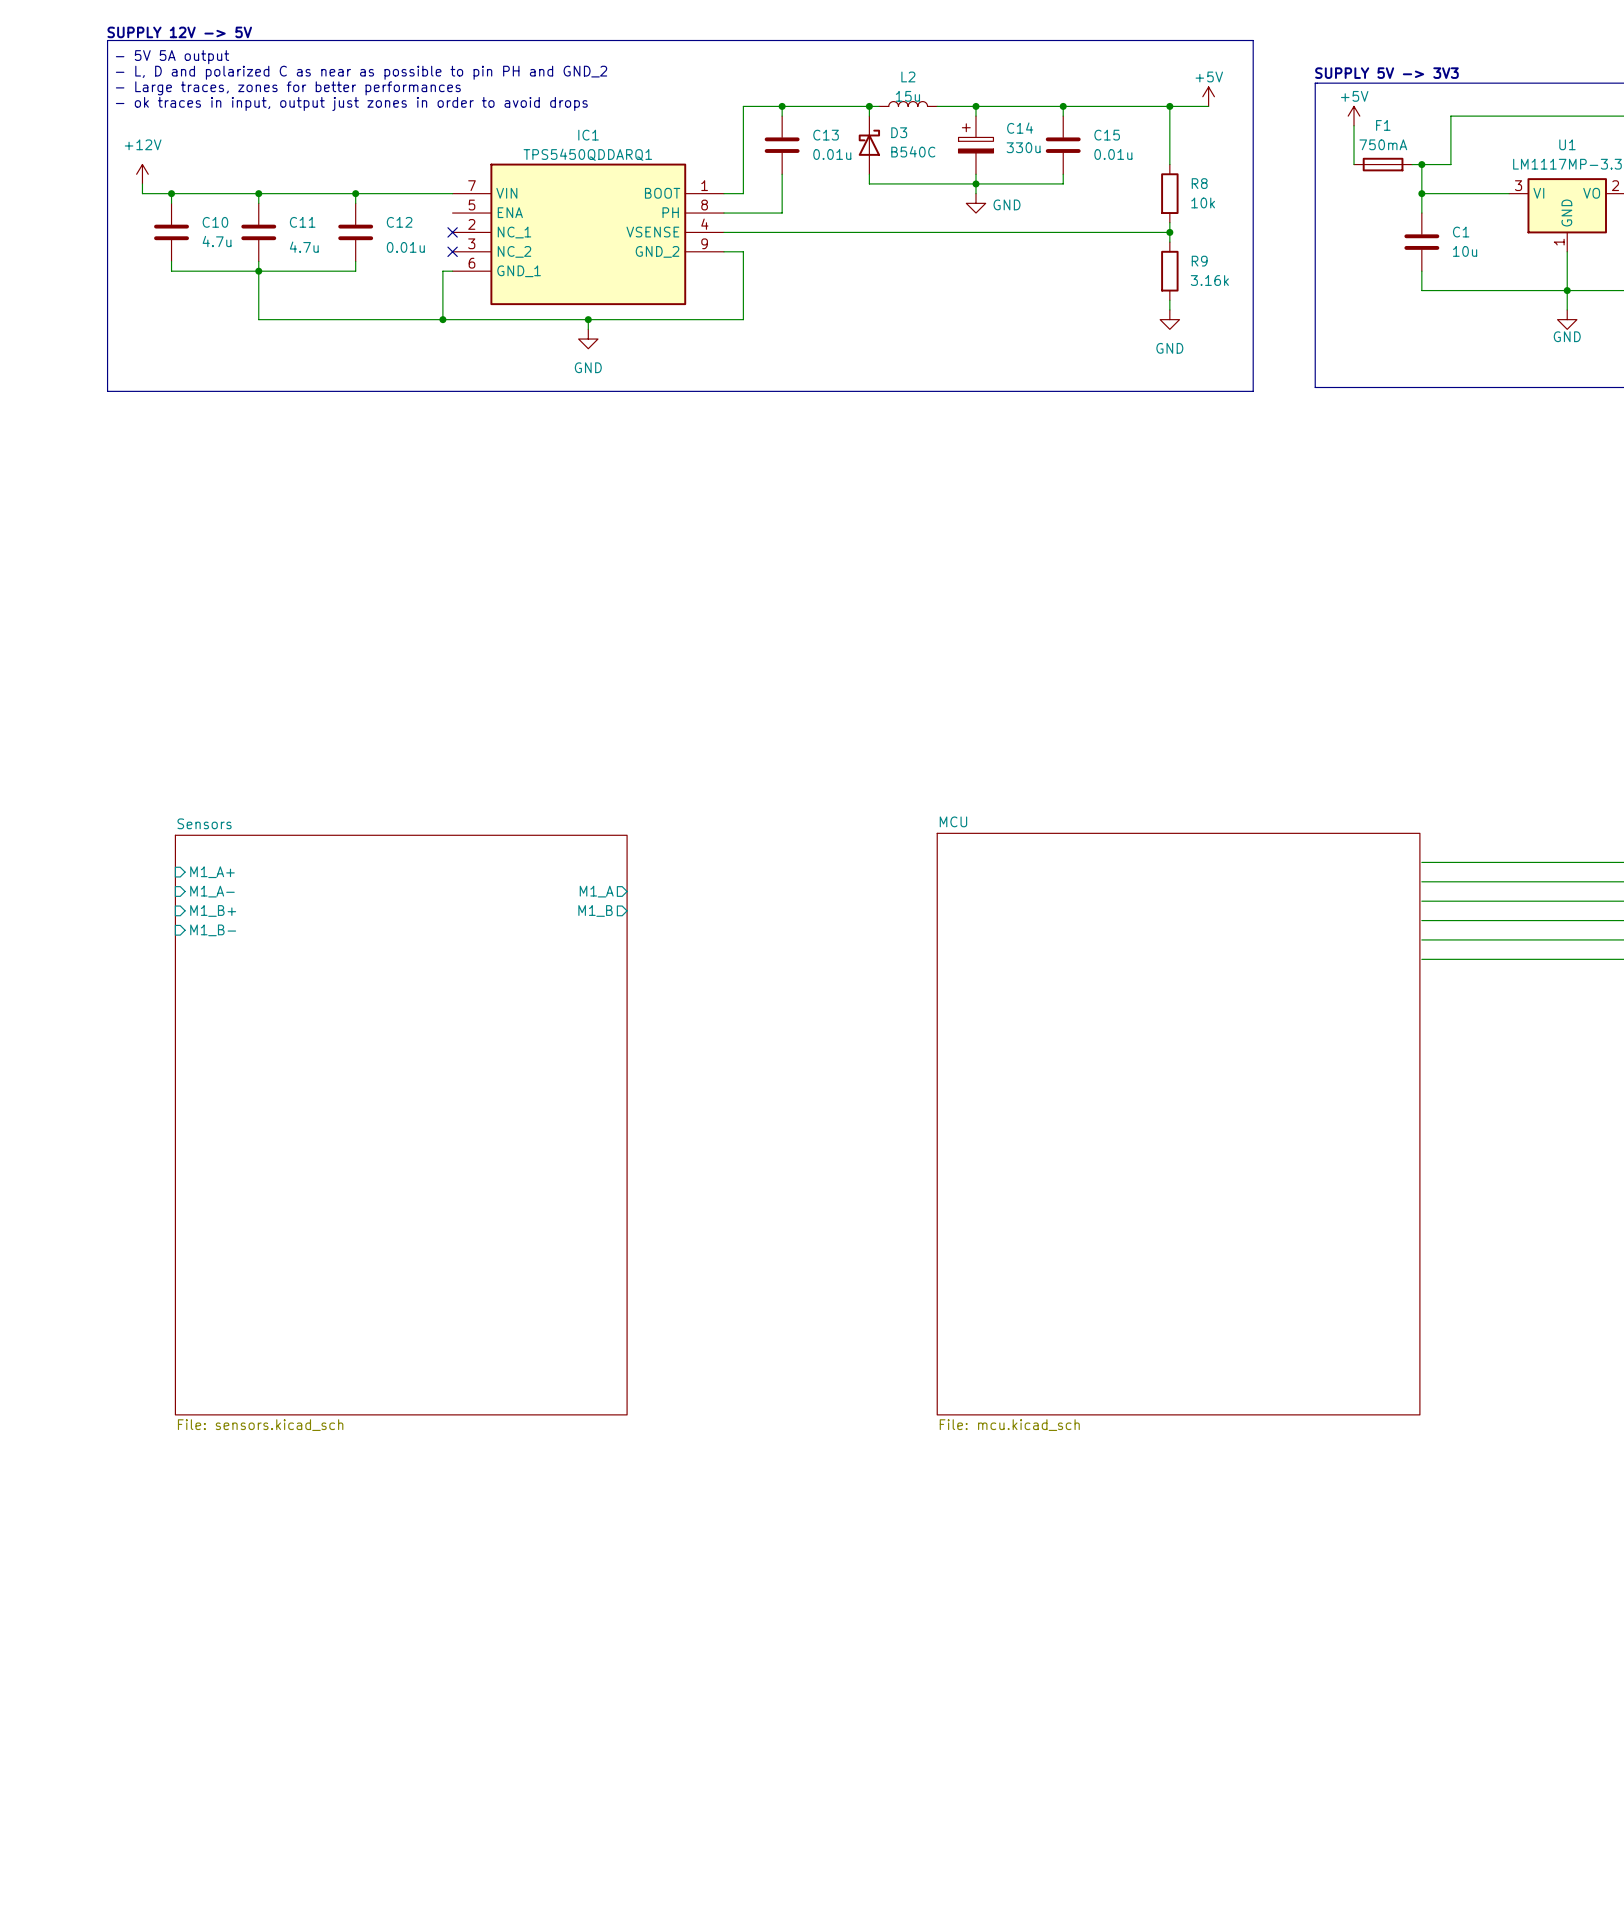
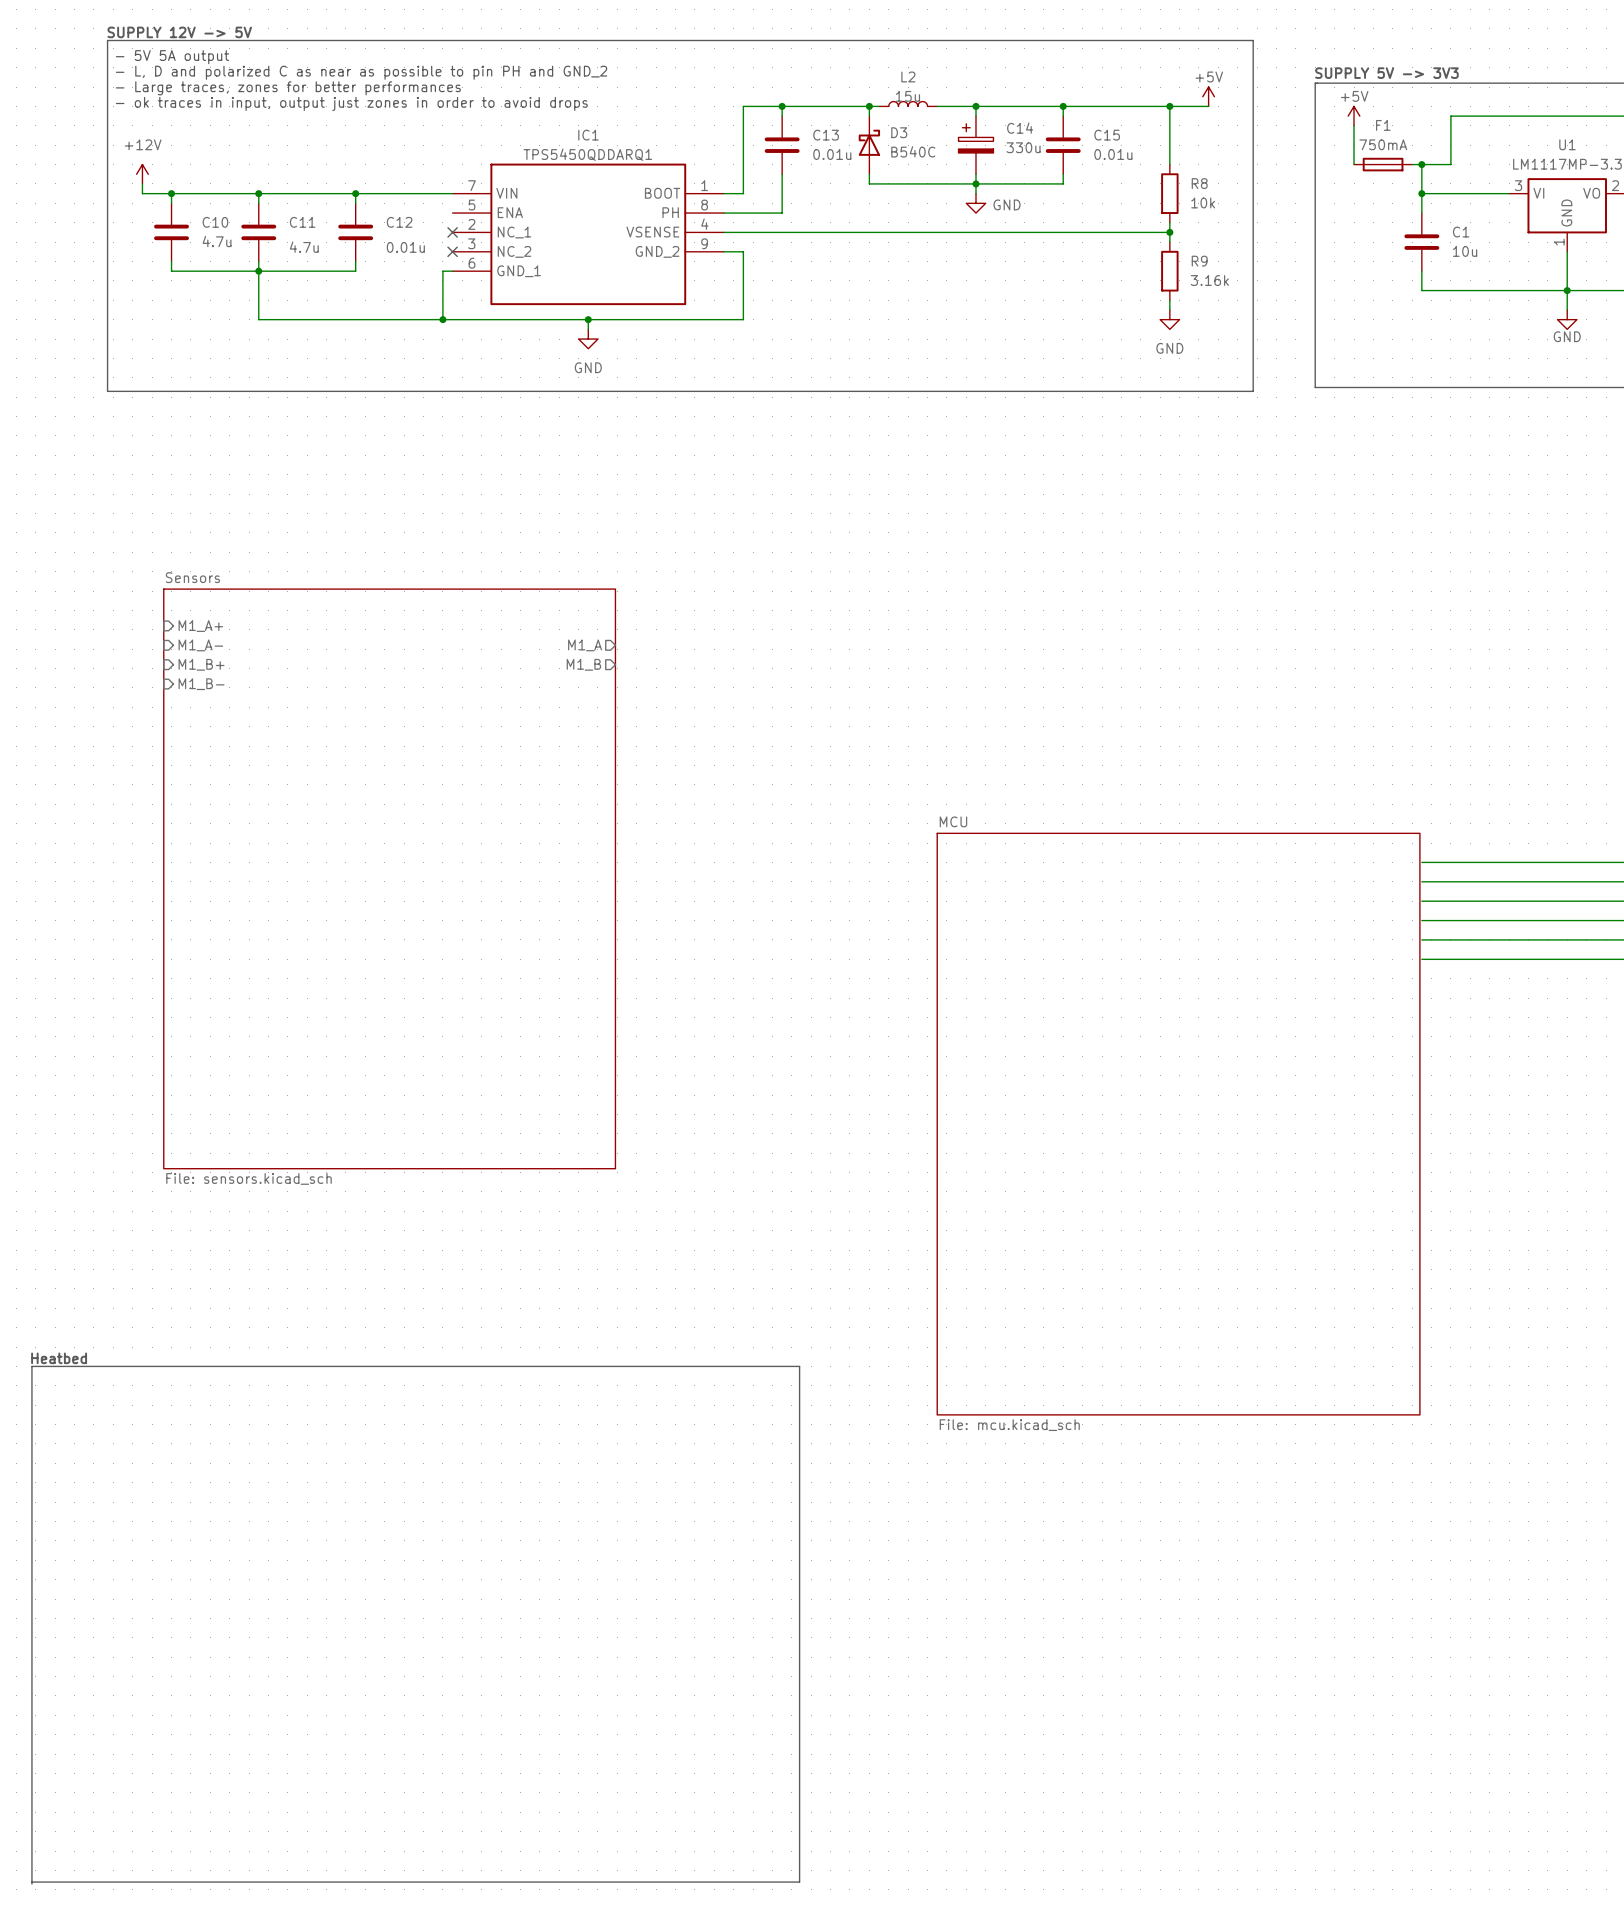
sheet pin: none -> M1_A+ (200, 626)
sheet pin: none -> M1_A- (200, 645)
sheet pin: none -> M1_A (585, 645)
sheet pin: none -> M1_B+ (201, 664)
sheet pin: none -> M1_B (583, 664)
sheet pin: none -> M1_B- (201, 684)
sheet pin: M1_A+ (212, 872) -> none
sheet Sensors: none -> File: sensors.kicad_sch (389, 878)
sheet pin: M1_A- (212, 891) -> none
sheet pin: M1_A (596, 891) -> none
sheet pin: M1_B+ (213, 910) -> none
sheet pin: M1_B (595, 910) -> none
sheet pin: M1_B- (213, 930) -> none
sheet Sensors: File: sensors.kicad_sch (401, 1125) -> none
text: none -> Heatbed (59, 1358)
line: none -> (31, 1882) (799, 1882) (799, 1366) (31, 1366) (31, 1884)

